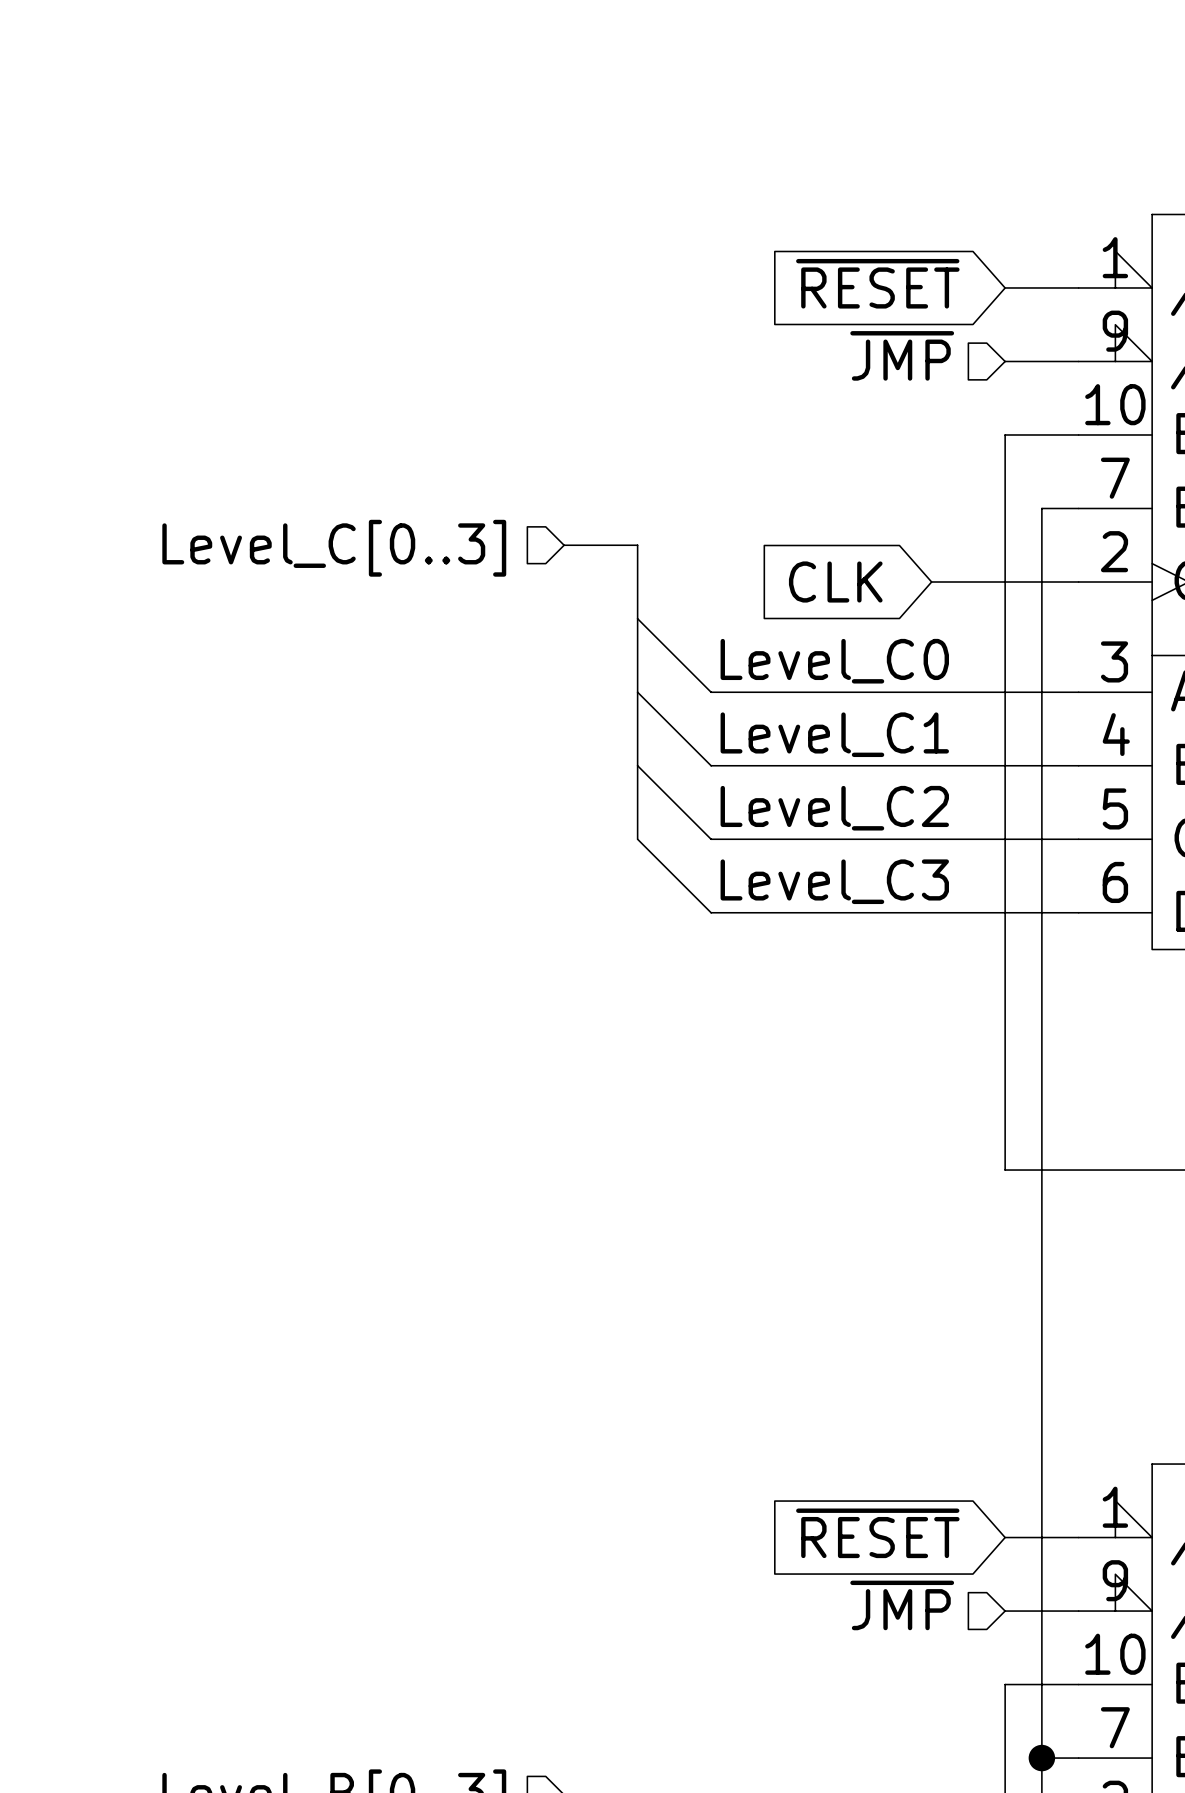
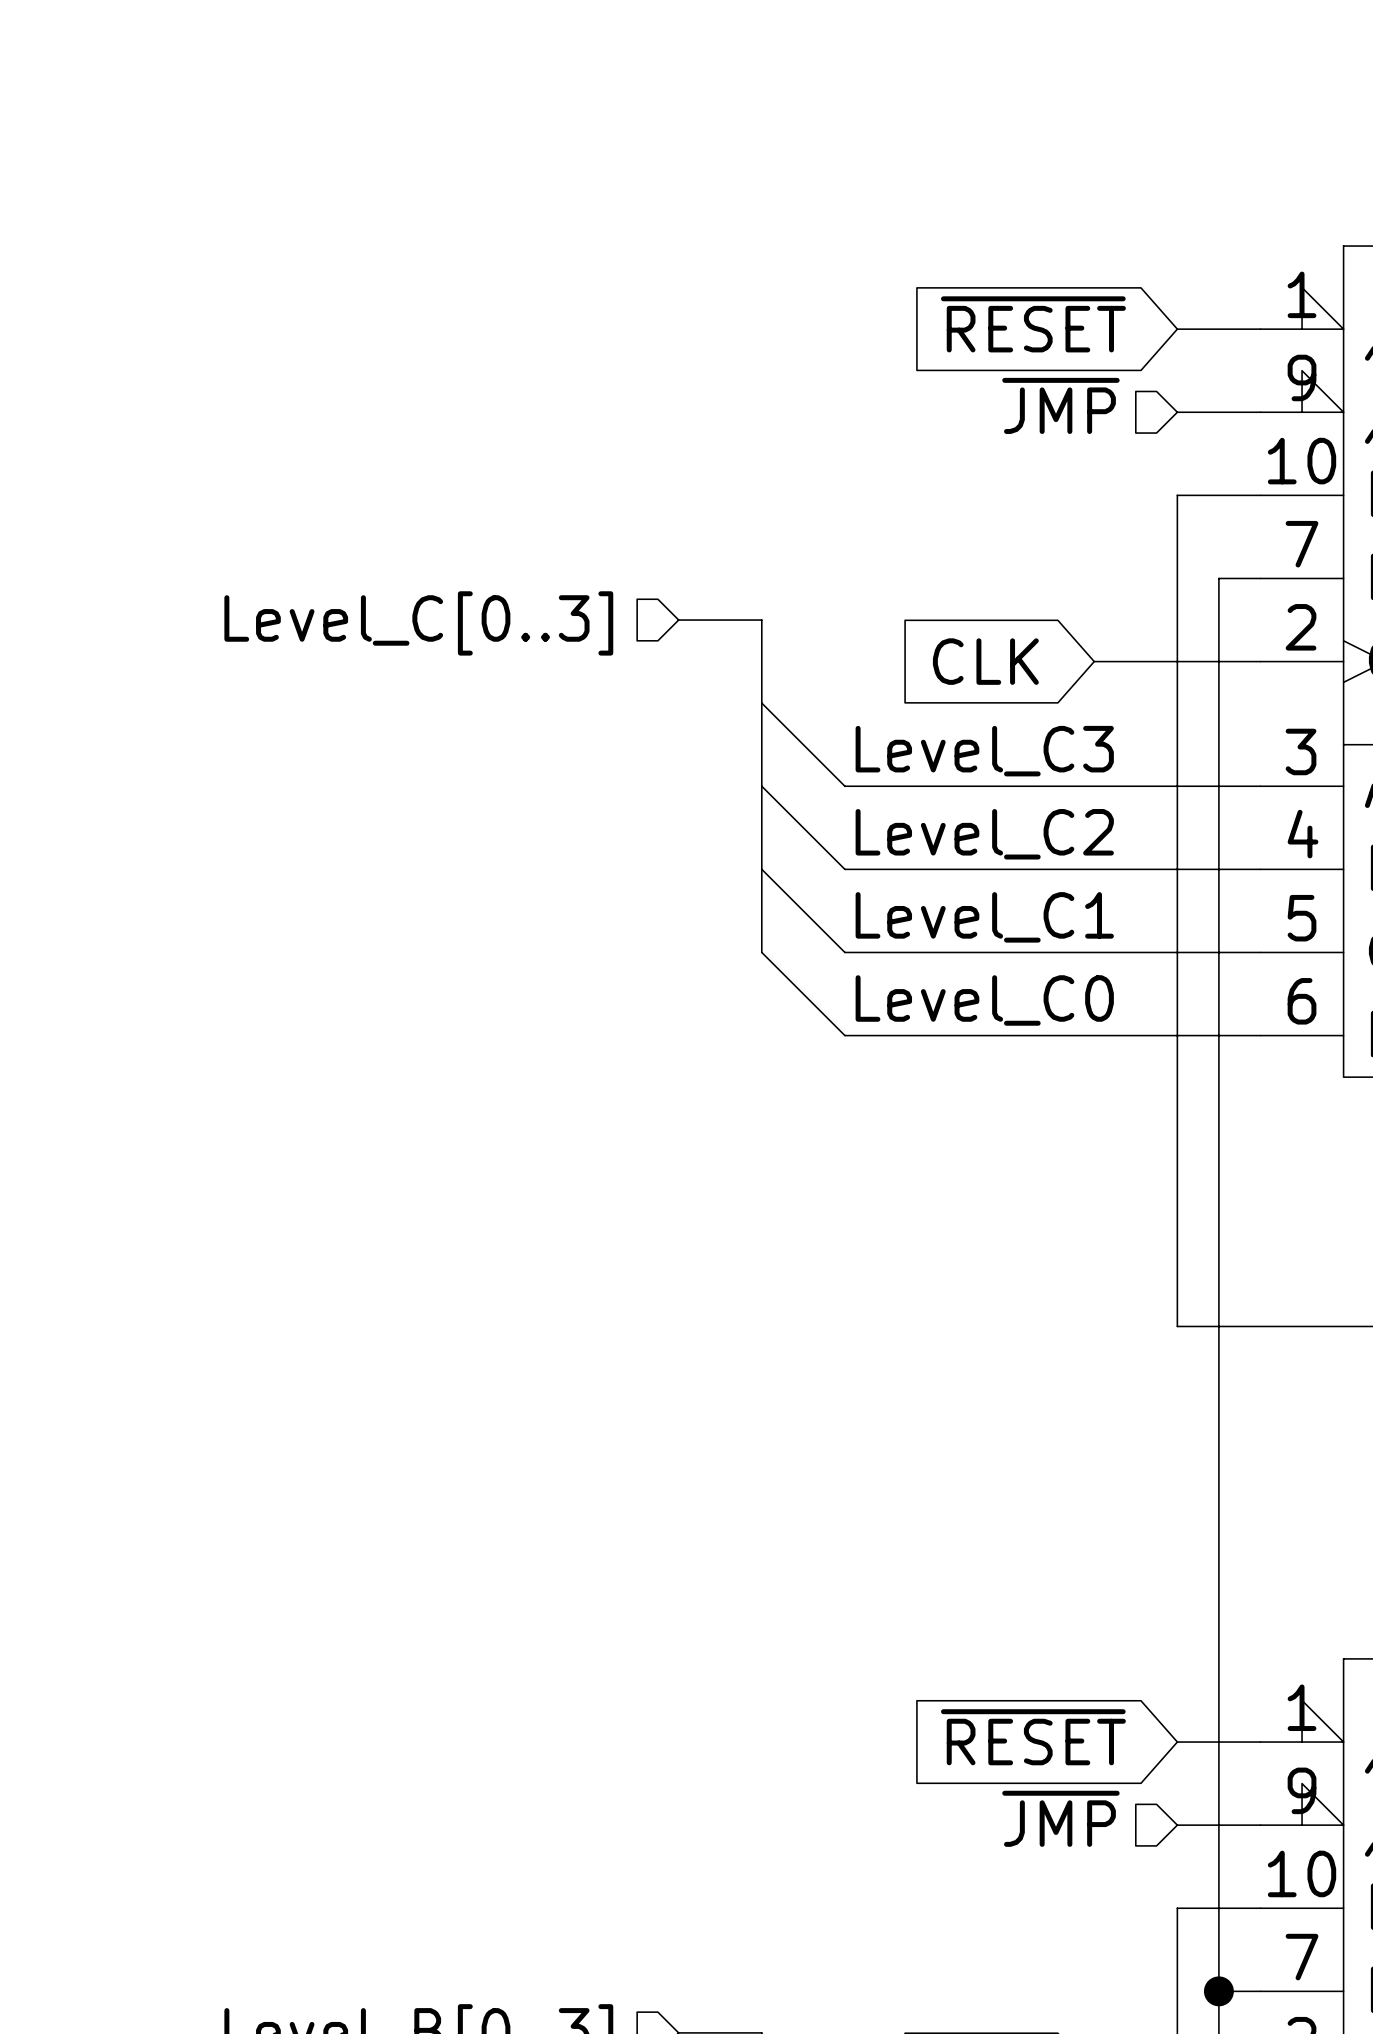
label: Level_C0 (834, 661) -> Level_C3 (984, 751)
label: Level_C1 (834, 734) -> Level_C2 (984, 834)
label: Level_C2 (834, 808) -> Level_C1 (984, 917)
label: Level_C3 (834, 881) -> Level_C0 (984, 1000)

